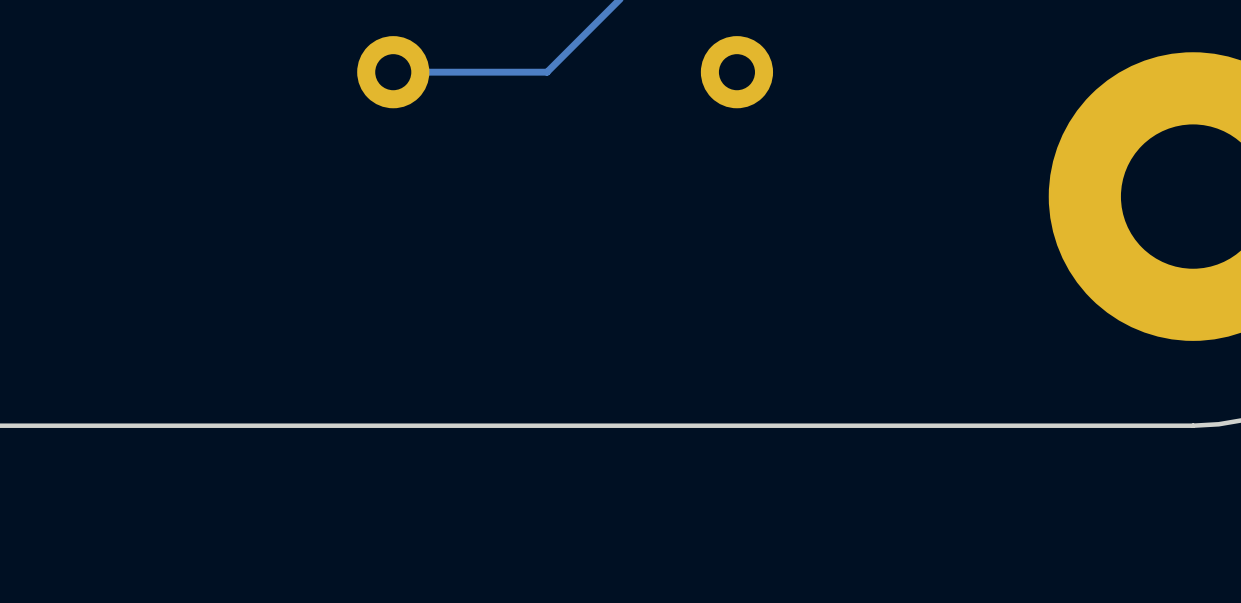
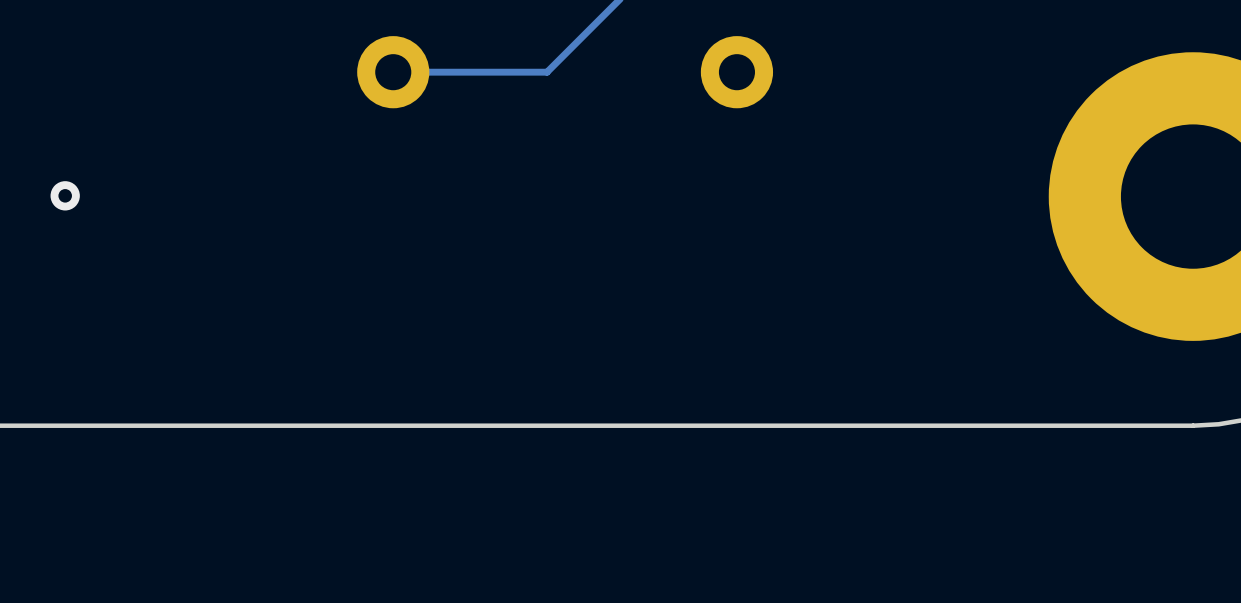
via: none -> (65, 195)

